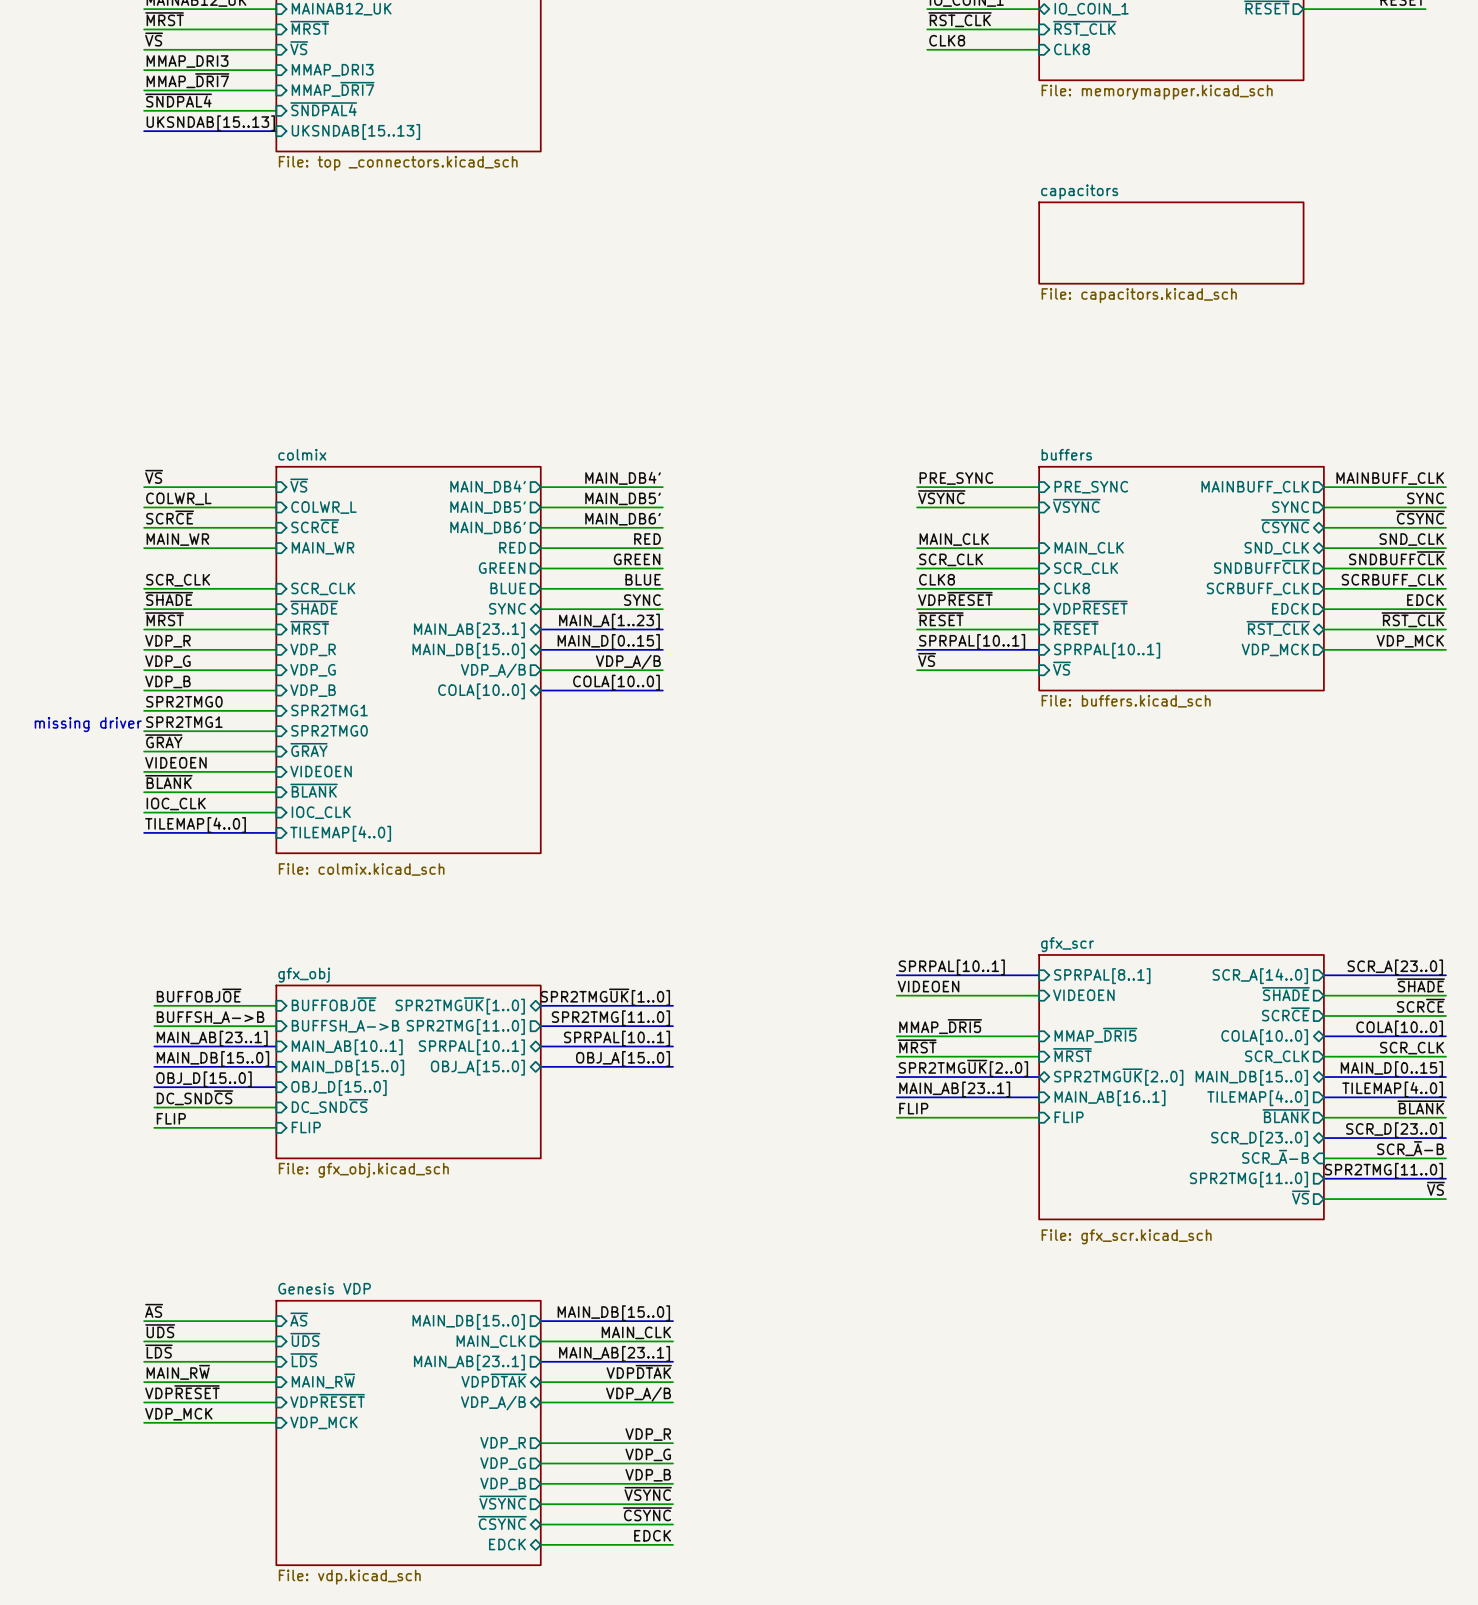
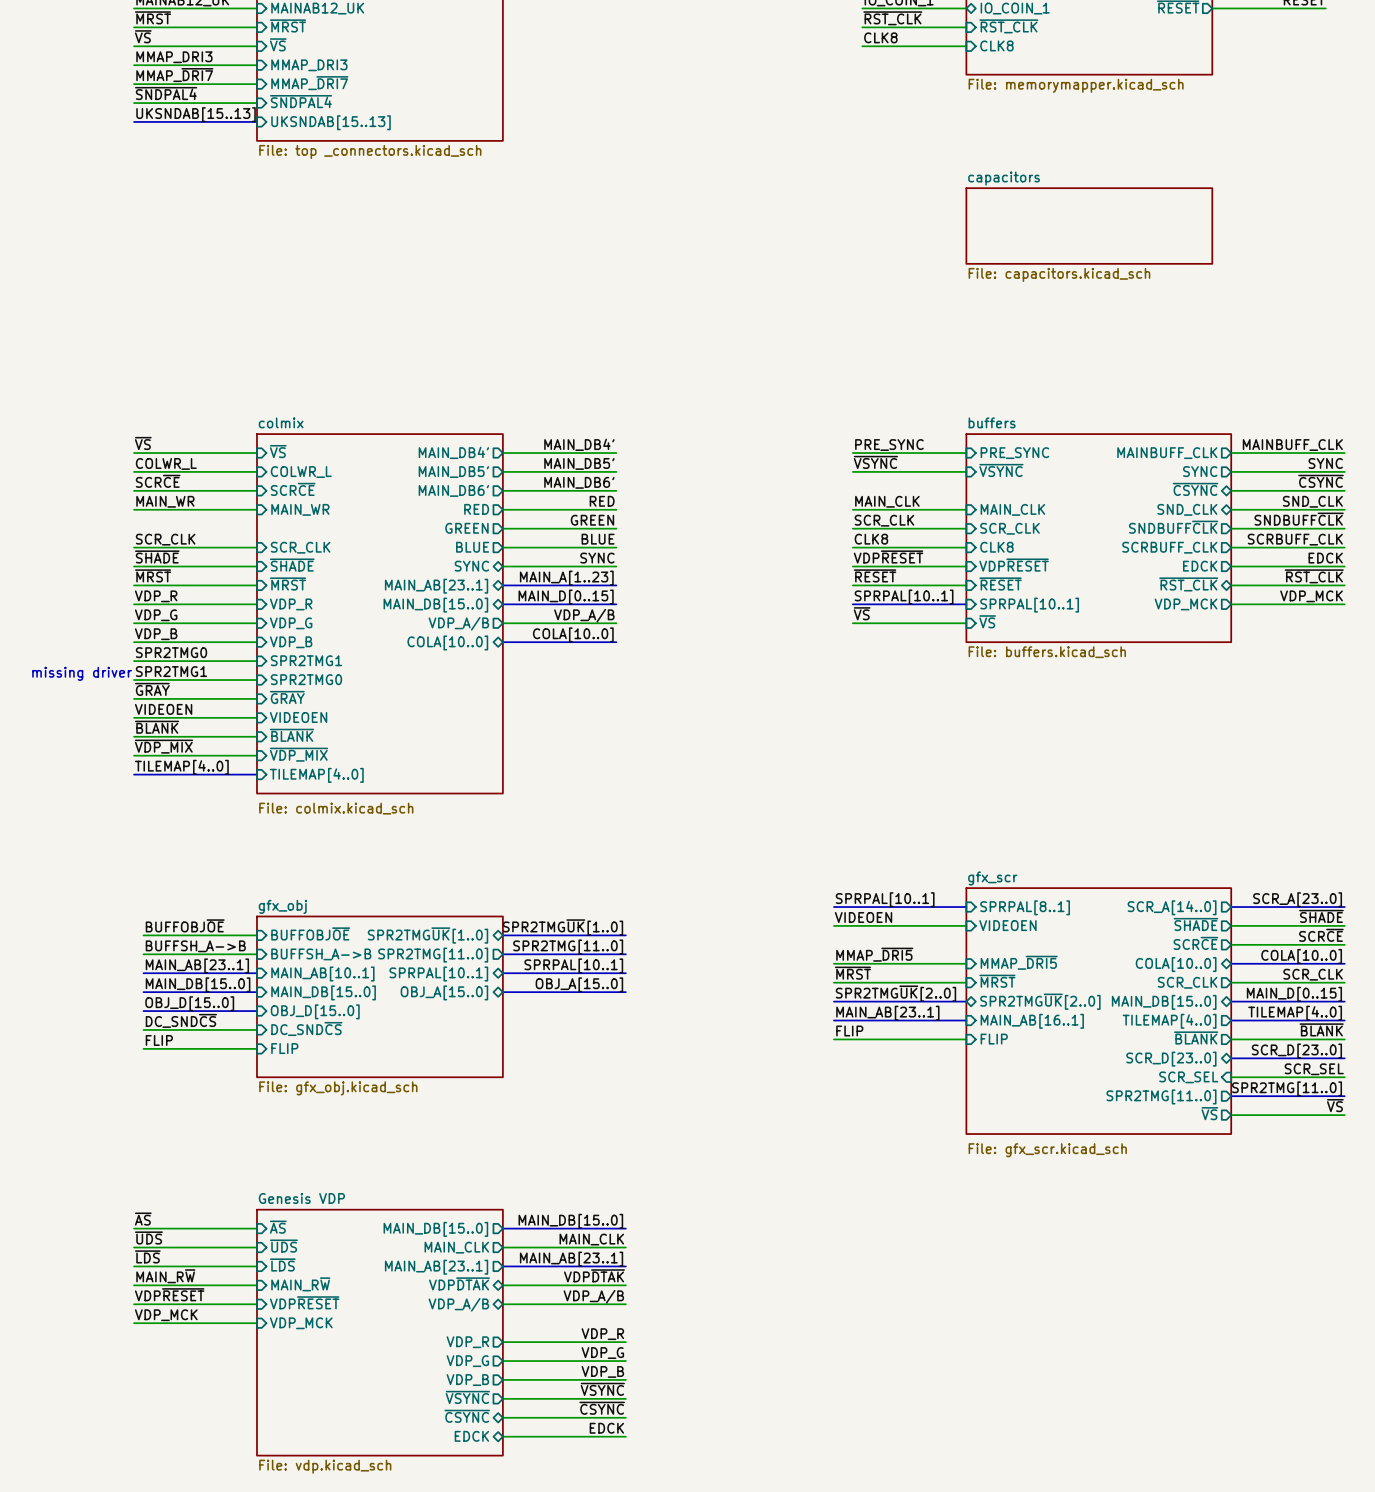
label: IOC_CLK (176, 803) -> ~{VDP_MIX} (164, 746)
sheet pin: IOC_CLK (321, 812) -> ~{VDP_MIX} (299, 754)
label: SCR_~{A}-B (1410, 1148) -> SCR_SEL (1314, 1069)
sheet pin: SCR_~{A}-B (1275, 1157) -> SCR_SEL (1188, 1077)

